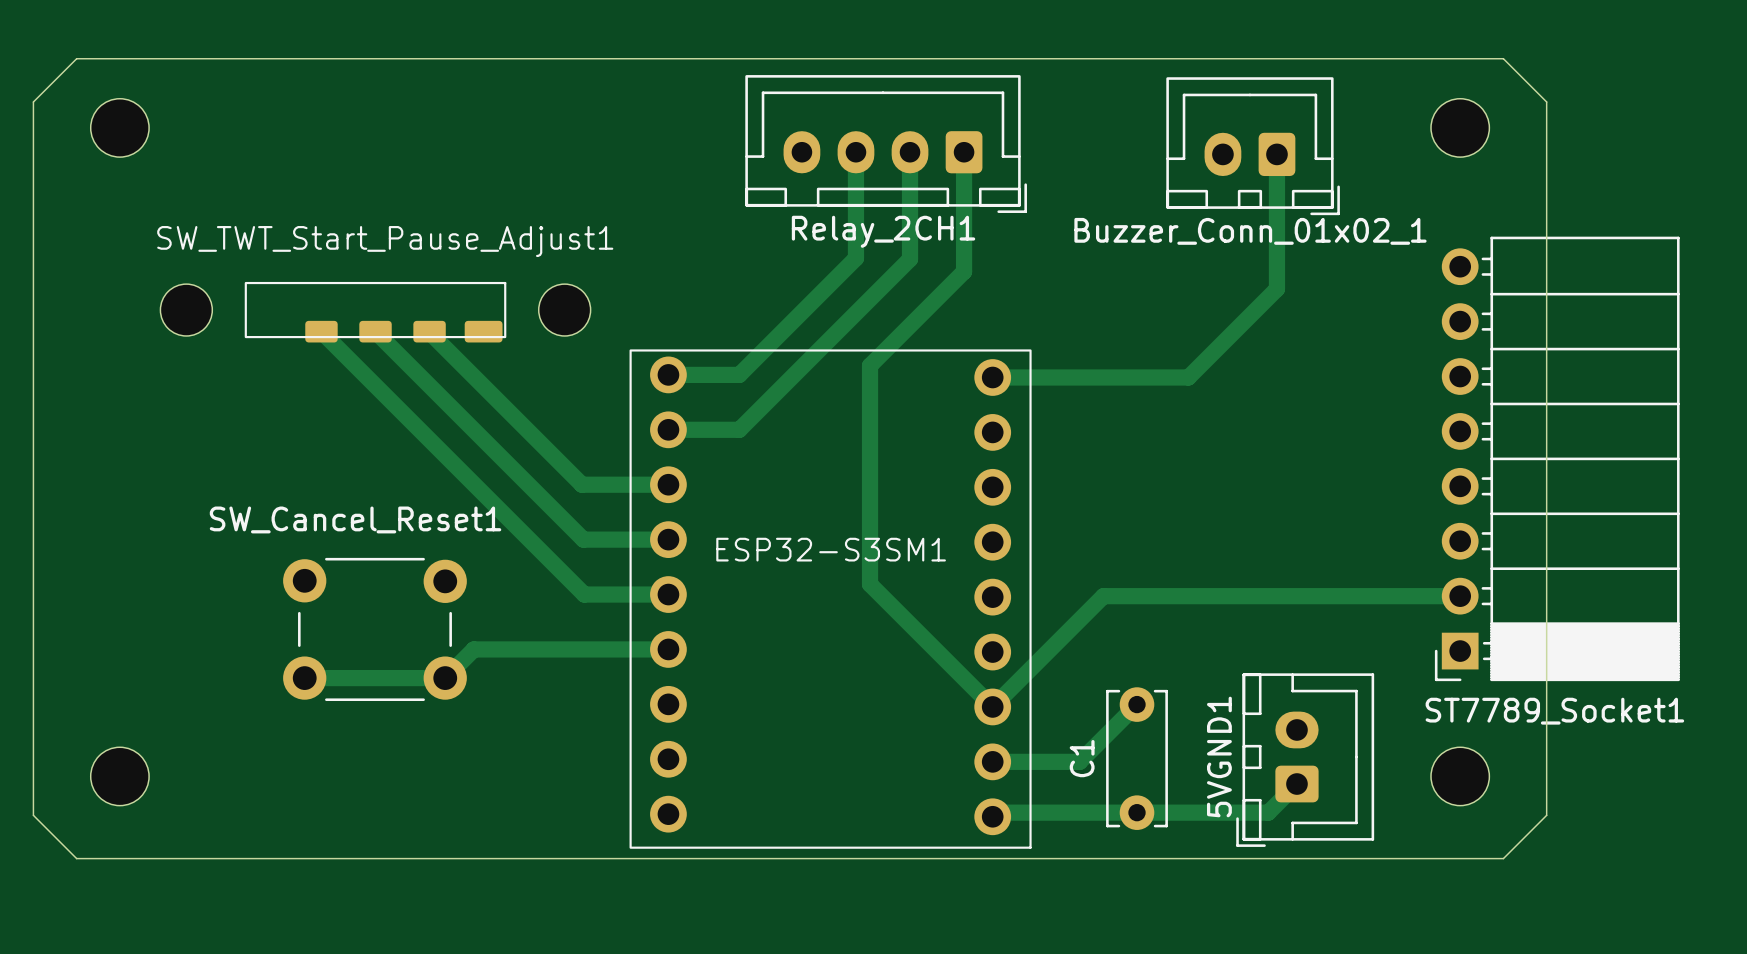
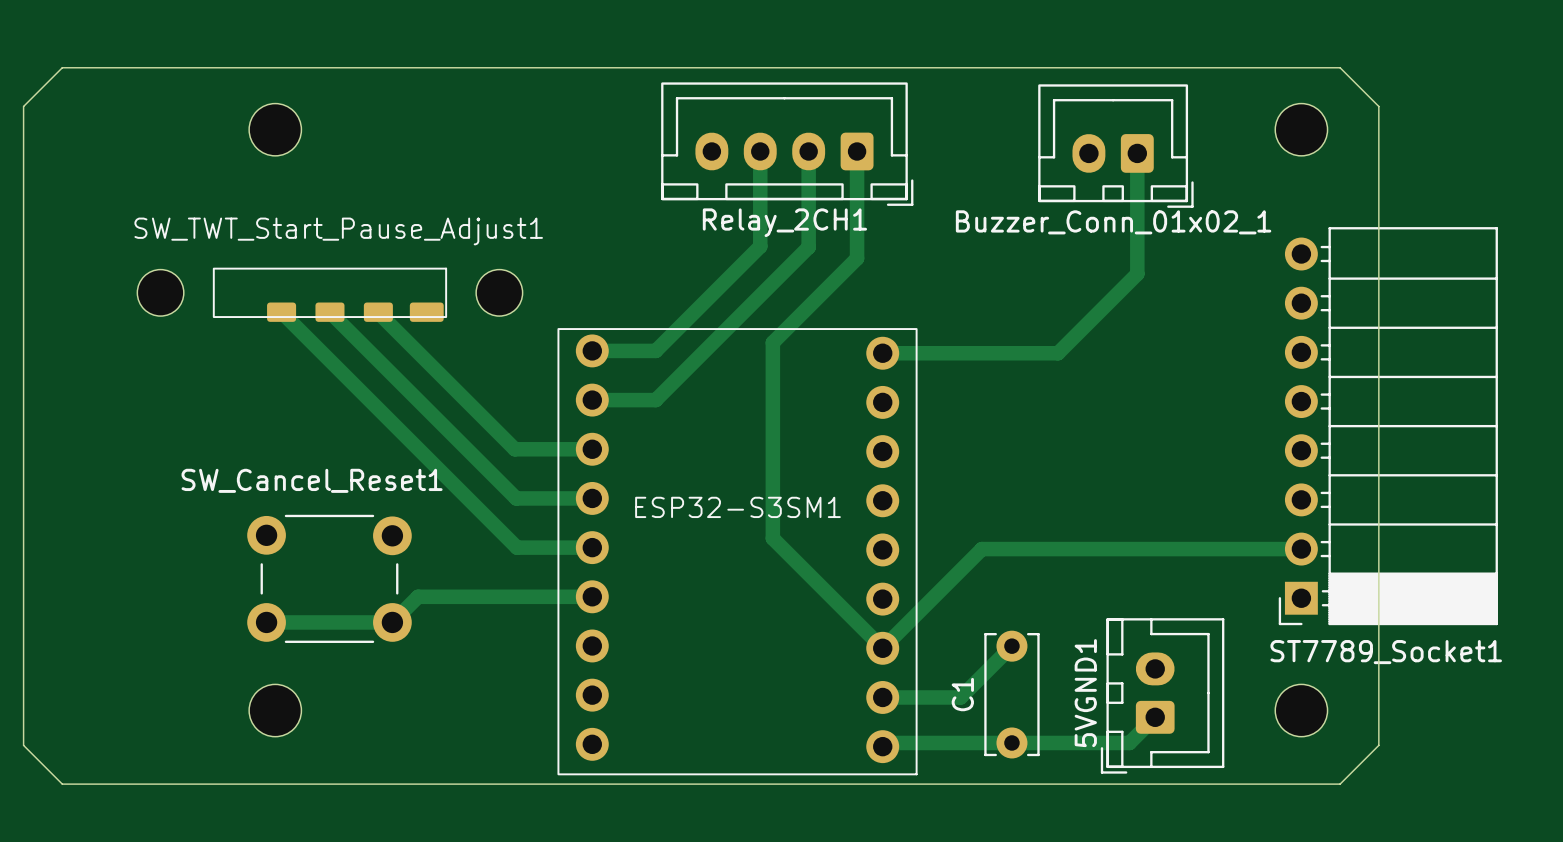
part position: (119, 127) -> (275, 129)
part position: (119, 776) -> (275, 710)

